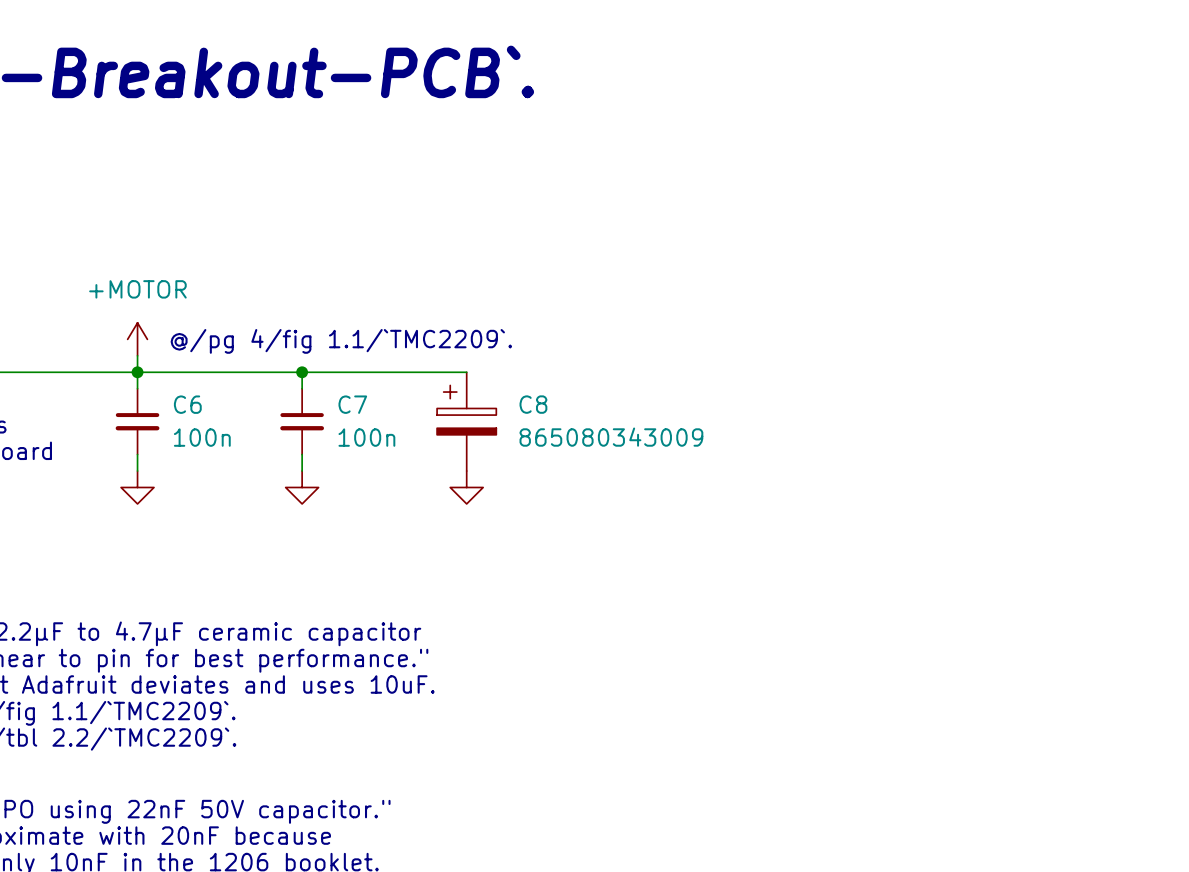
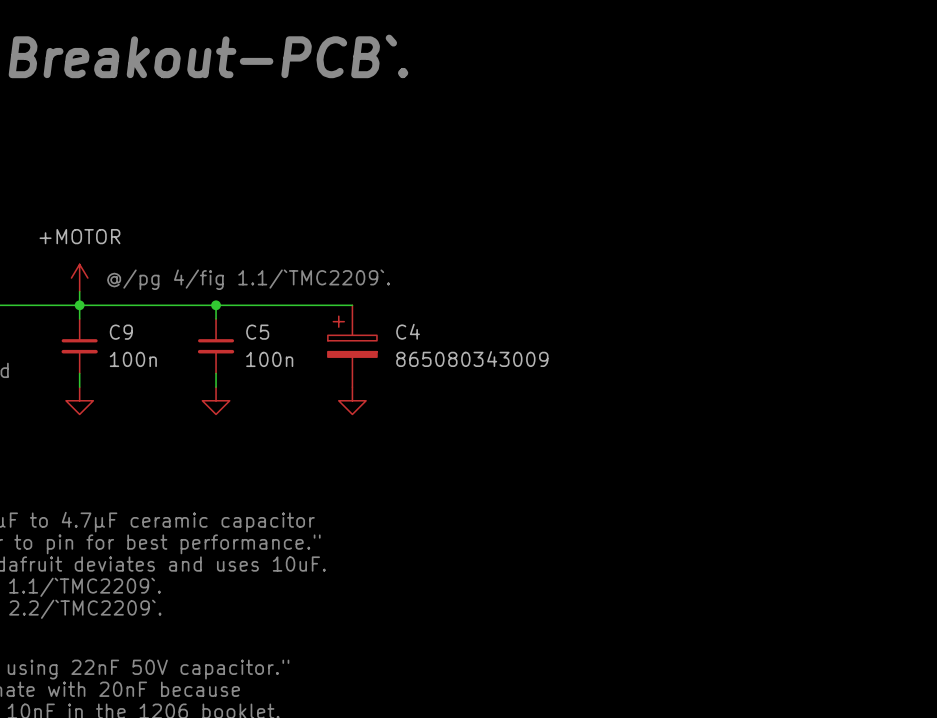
C6 name: C6 (187, 404) -> C9 (121, 332)
C7 name: C7 (352, 404) -> C5 (257, 332)
C8 name: C8 (533, 404) -> C4 (408, 331)

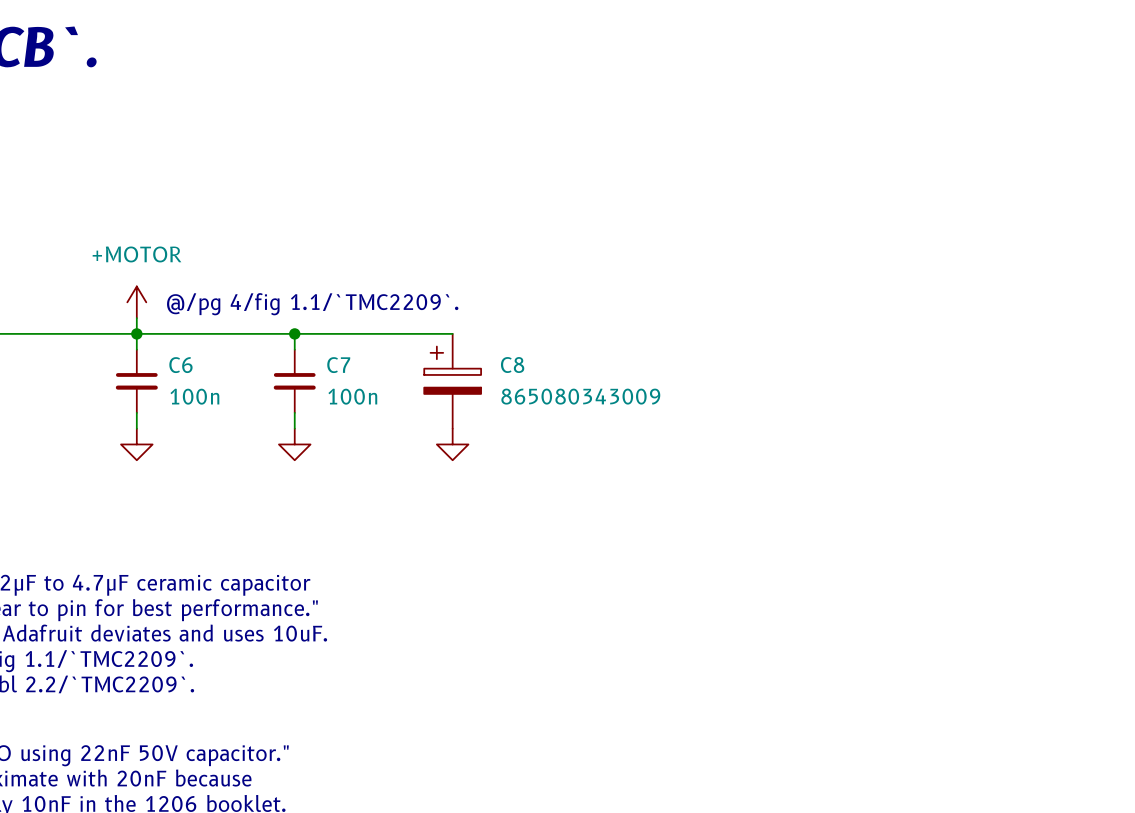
C4 name: C4 (408, 331) -> C8 (512, 365)
C9 name: C9 (121, 332) -> C6 (180, 365)
C5 name: C5 (257, 332) -> C7 (338, 365)

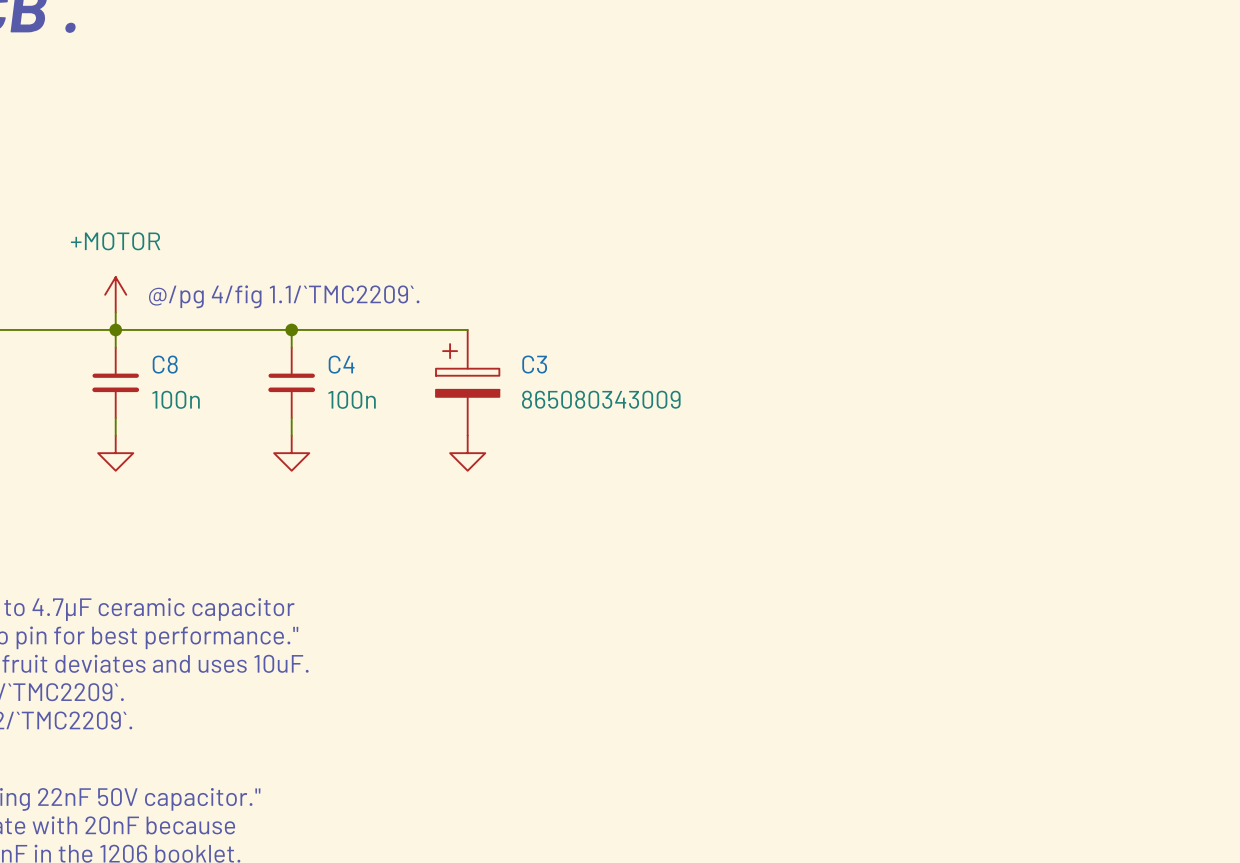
C6 name: C6 (180, 365) -> C8 (165, 364)
C7 name: C7 (338, 365) -> C4 (341, 364)
C8 name: C8 (512, 365) -> C3 (534, 364)

